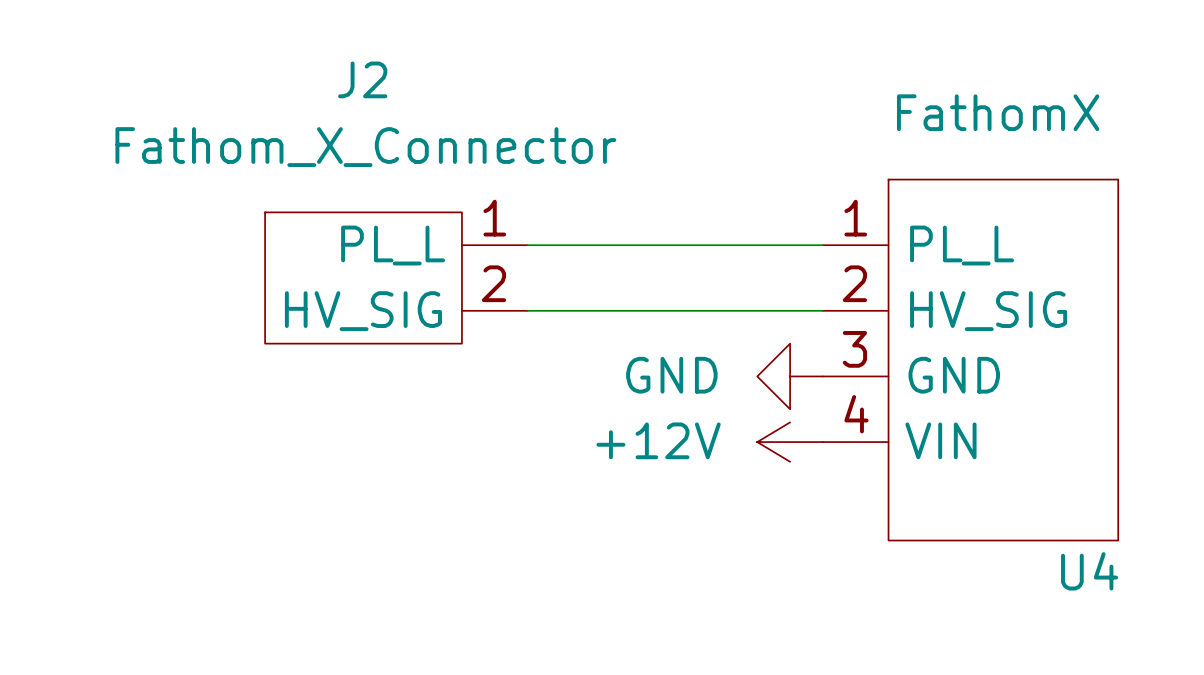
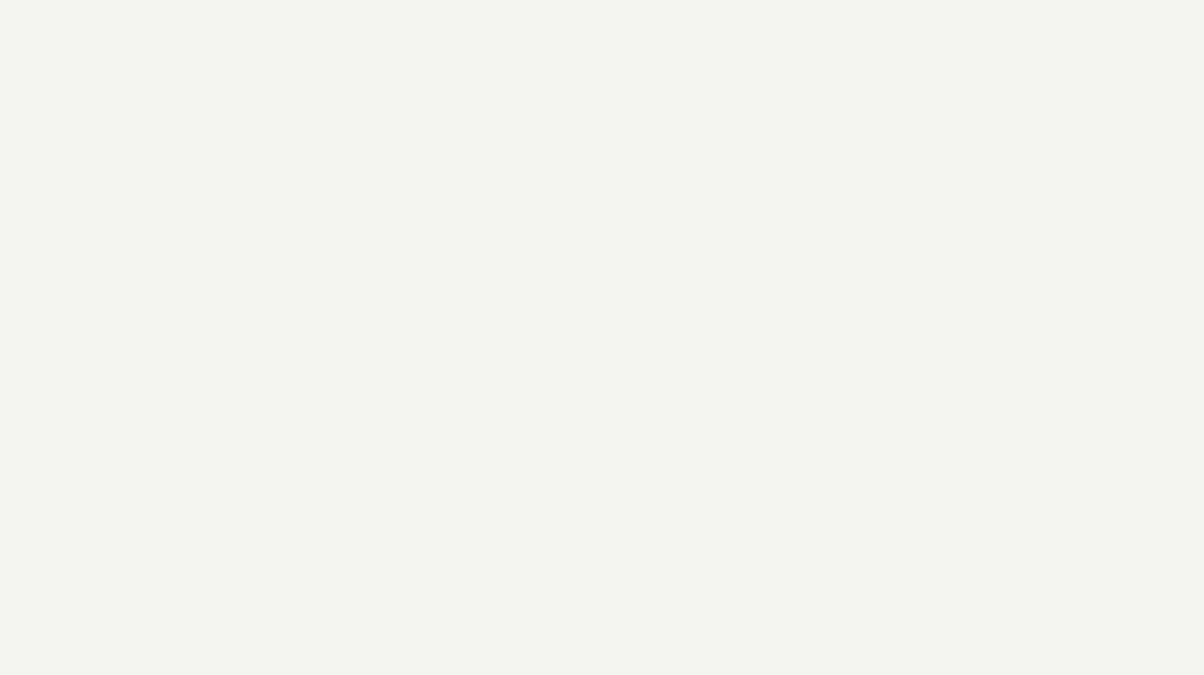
wire: (527, 245) (822, 245) -> none
J2: Fathom_X_Connector (396, 278) -> none
wire: (527, 310) (822, 310) -> none
U4: FathomX (970, 360) -> none
power symbol: GND (790, 376) -> none
power symbol: +12V (790, 442) -> none

